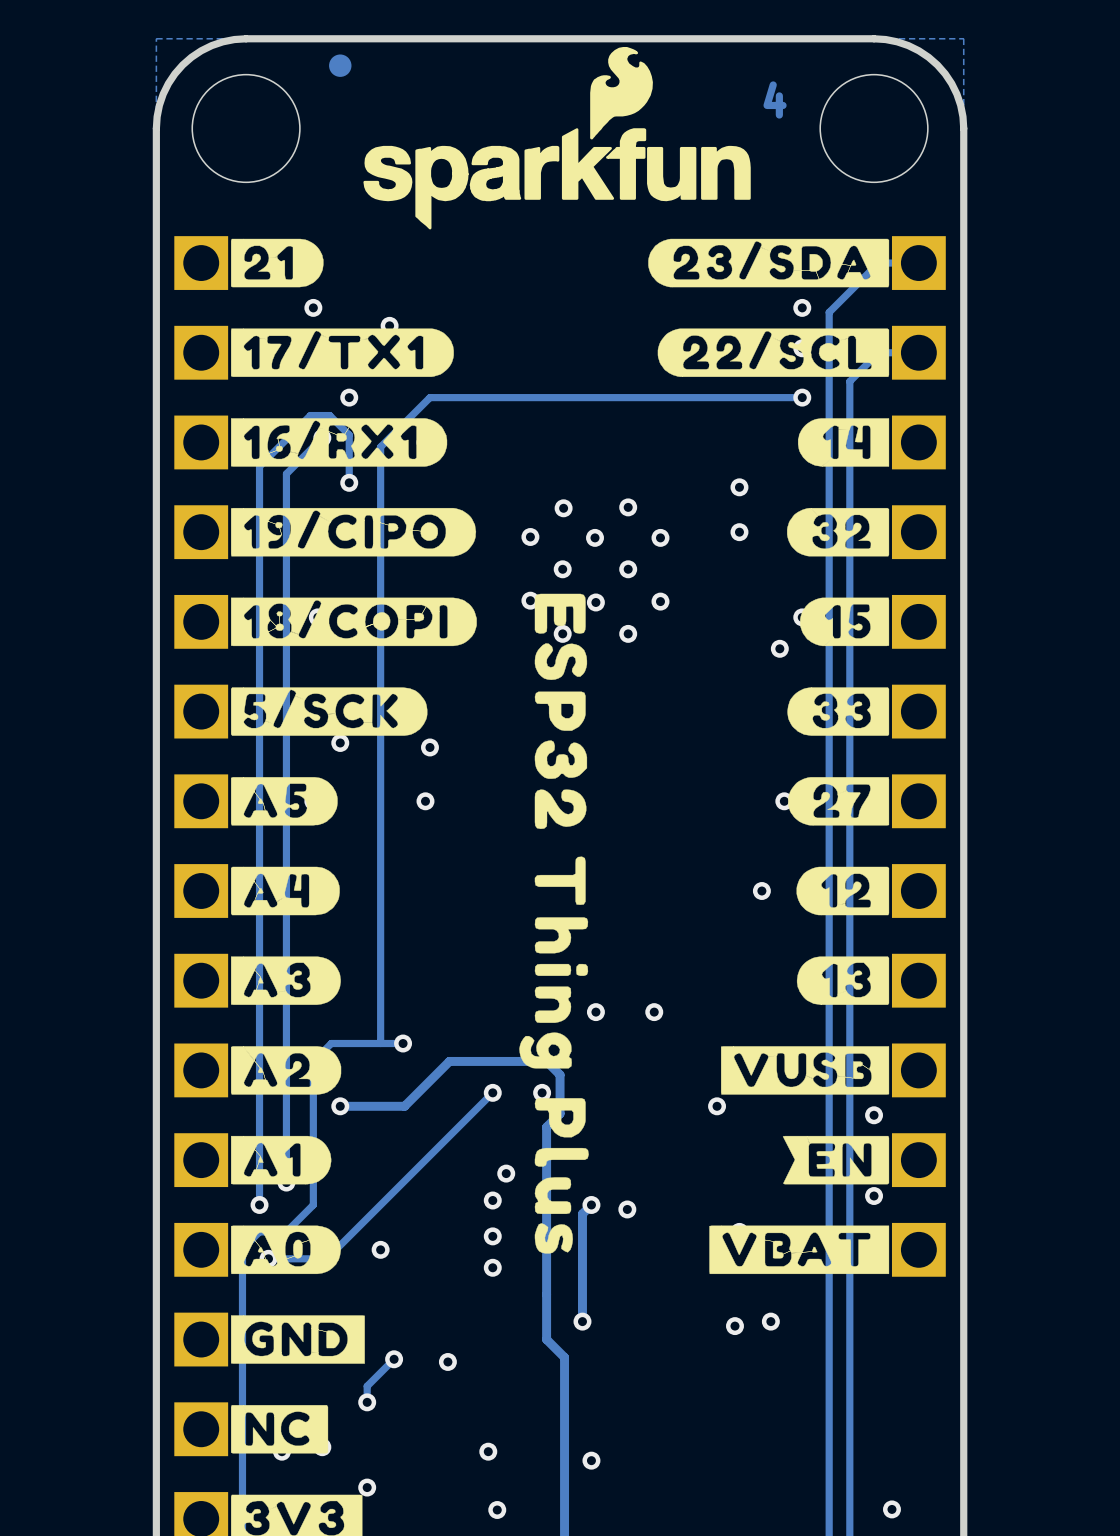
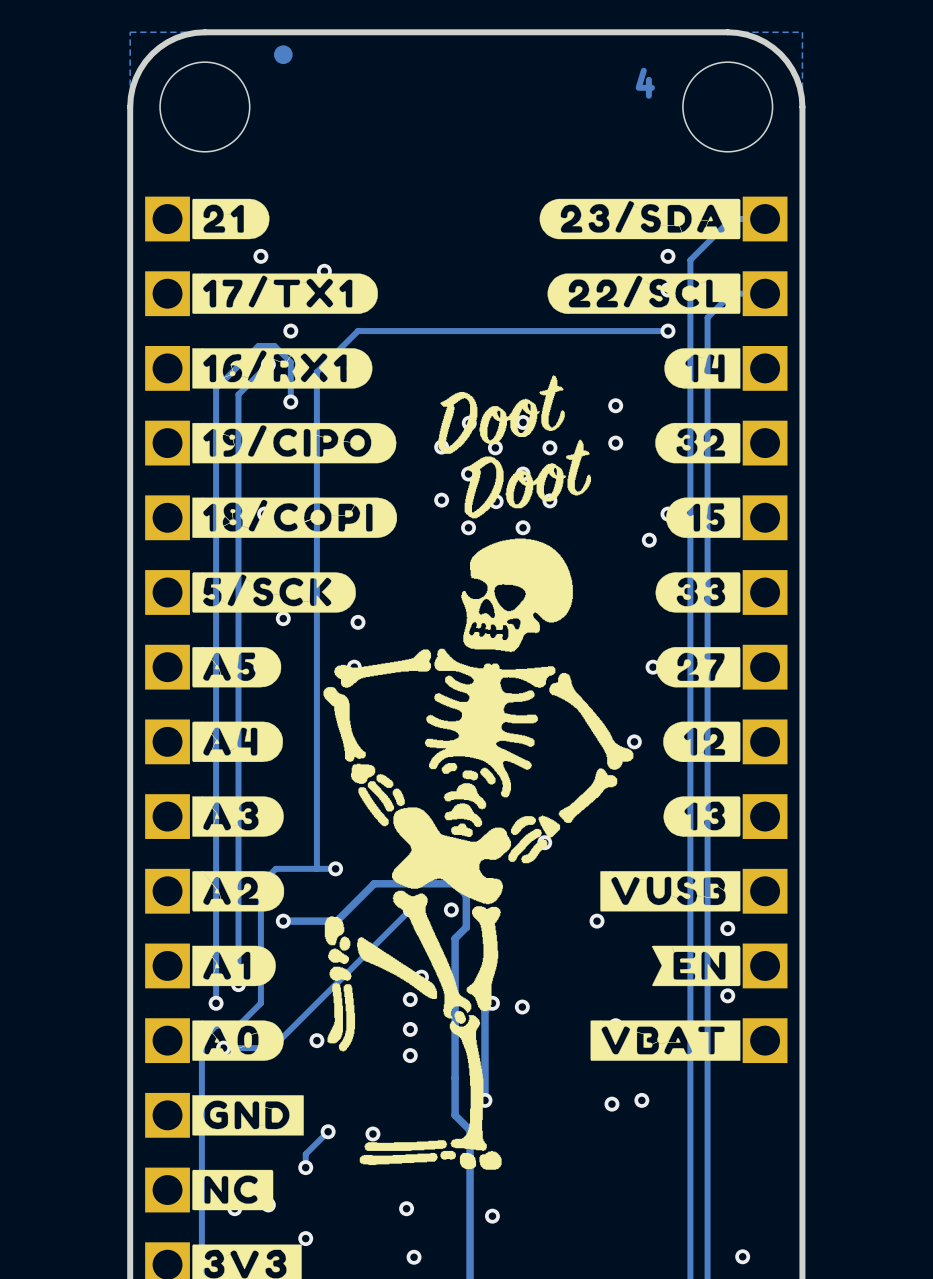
drawing: [363, 47, 751, 230] -> none
drawing: none -> [323, 375, 634, 1170]
drawing: [519, 593, 589, 1254] -> none

